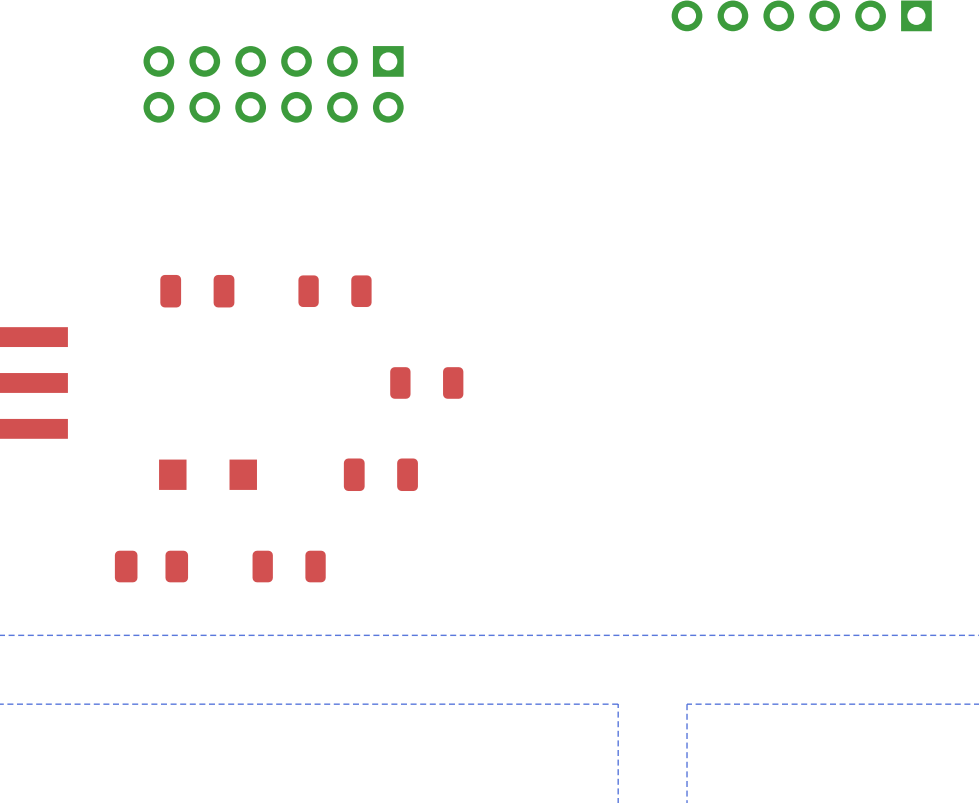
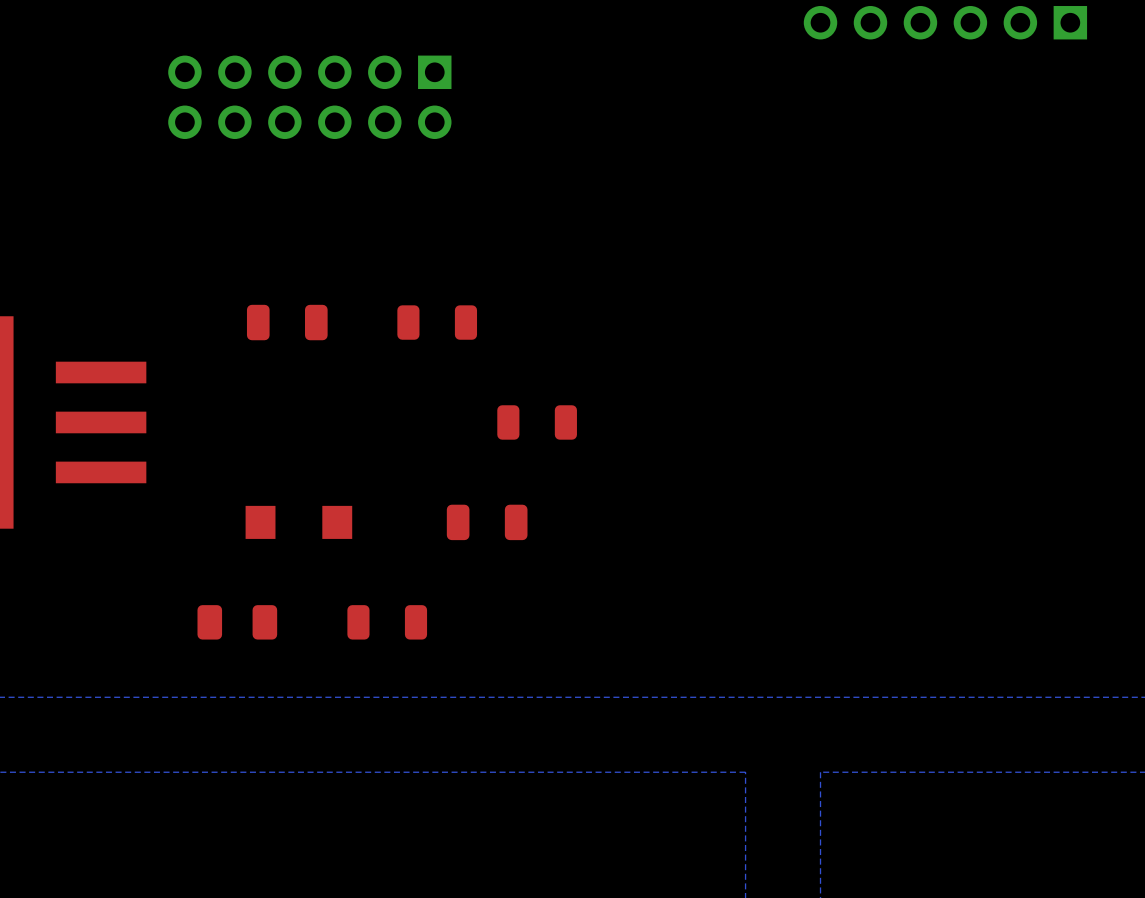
part position: (273, 84) -> (309, 97)

